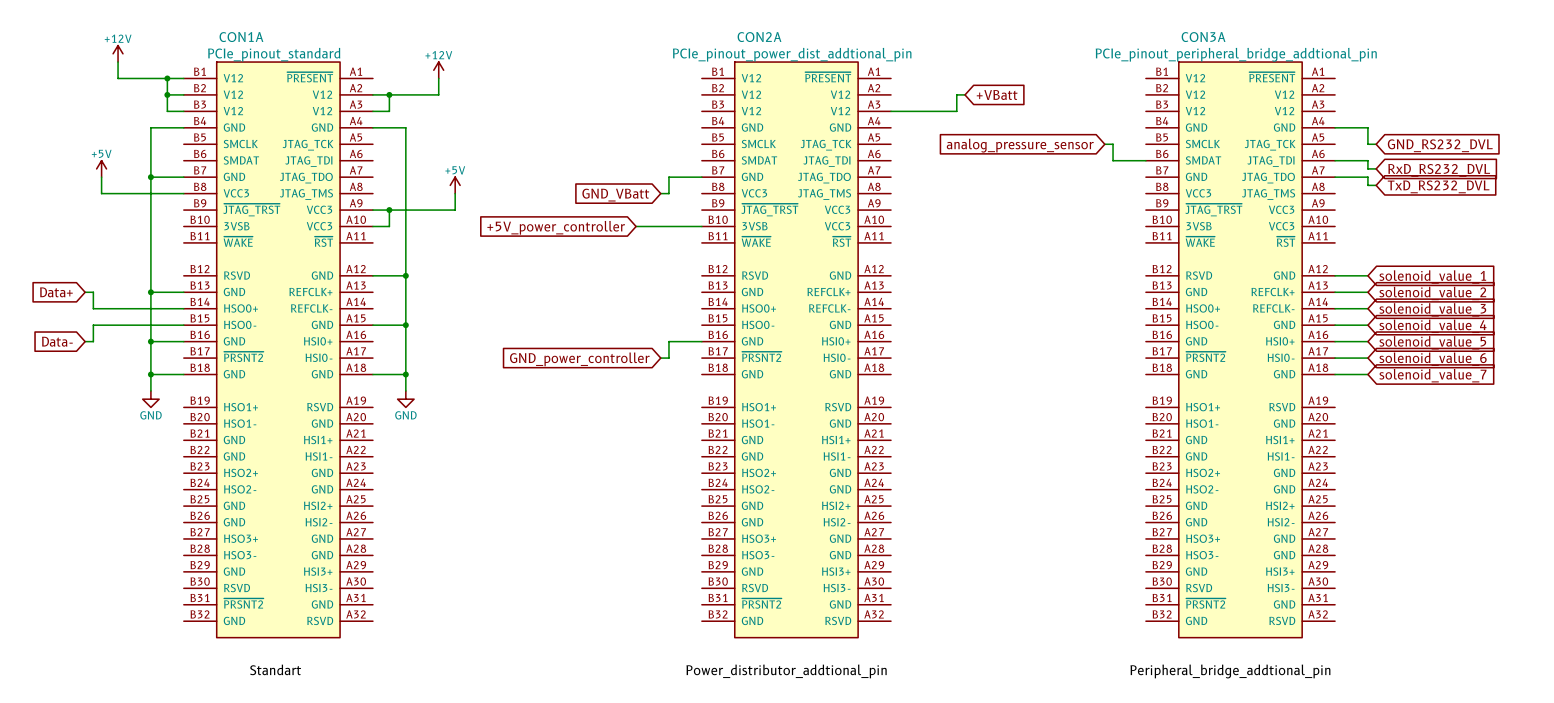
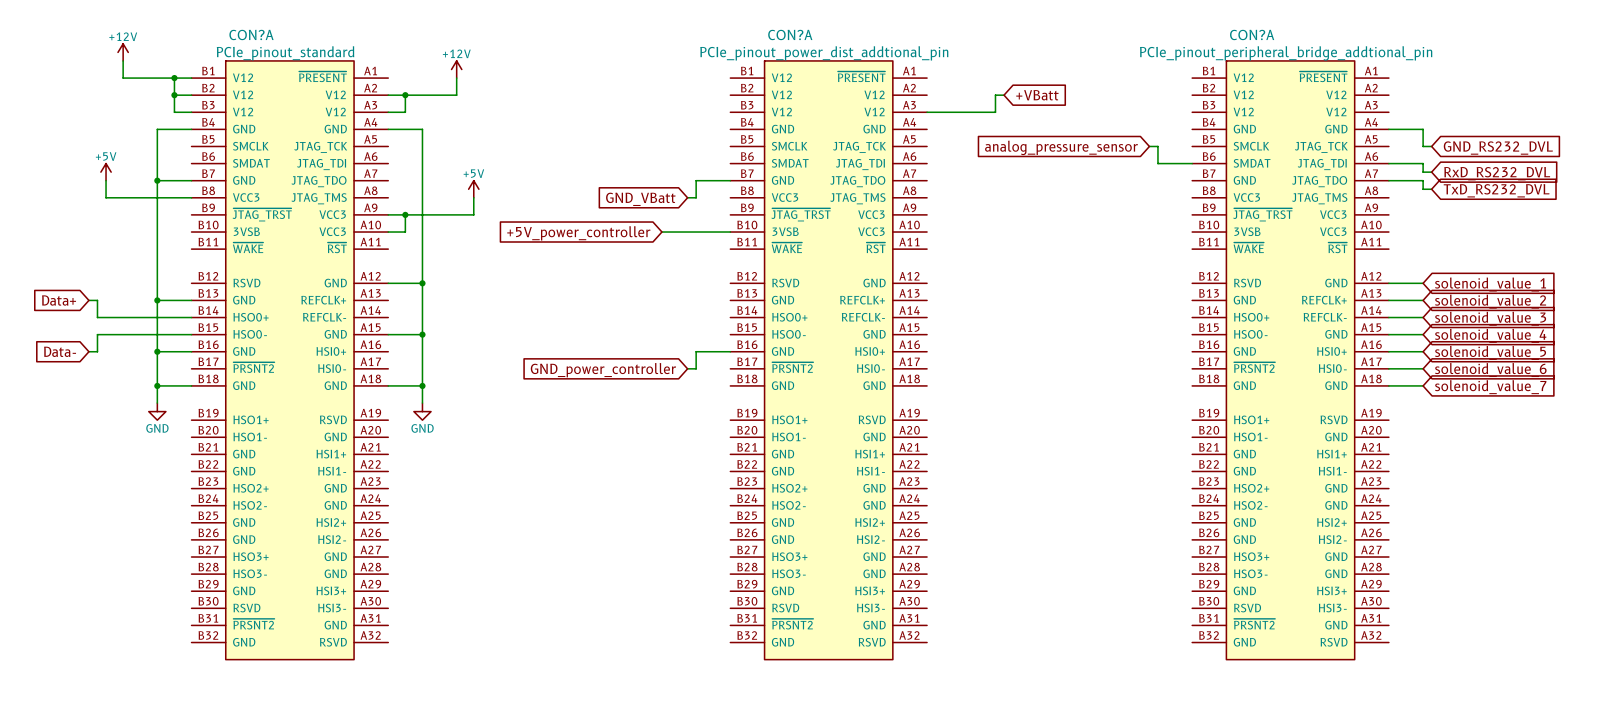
CON1A name: CON1A (241, 37) -> CON?A (251, 34)
CON2A name: CON2A (759, 37) -> CON?A (790, 34)
CON3A name: CON3A (1203, 37) -> CON?A (1252, 34)
label: Standart (275, 669) -> none
label: Power_distributor_addtional_pin (786, 671) -> none
label: Peripheral_bridge_addtional_pin (1230, 671) -> none

